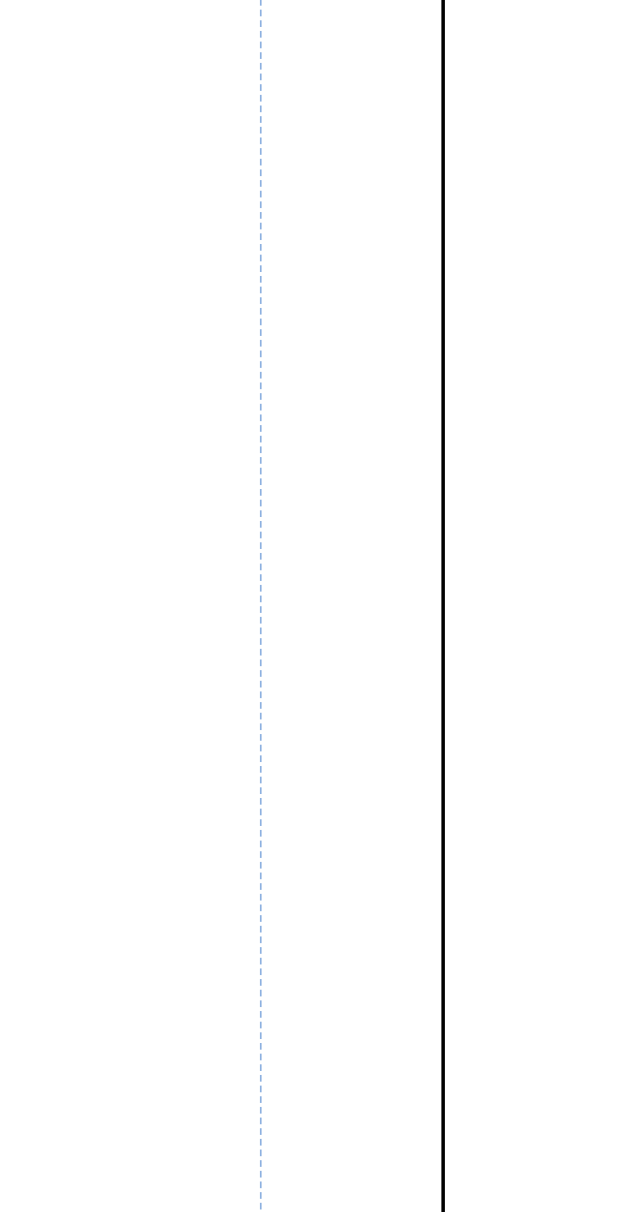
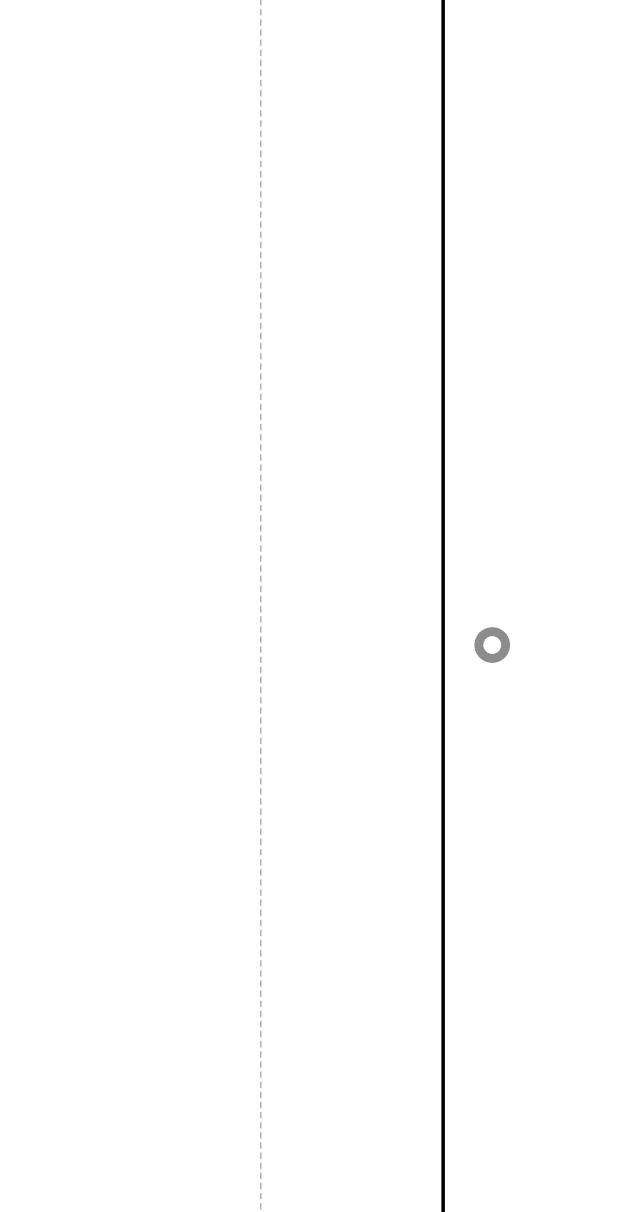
via: none -> (492, 645)

